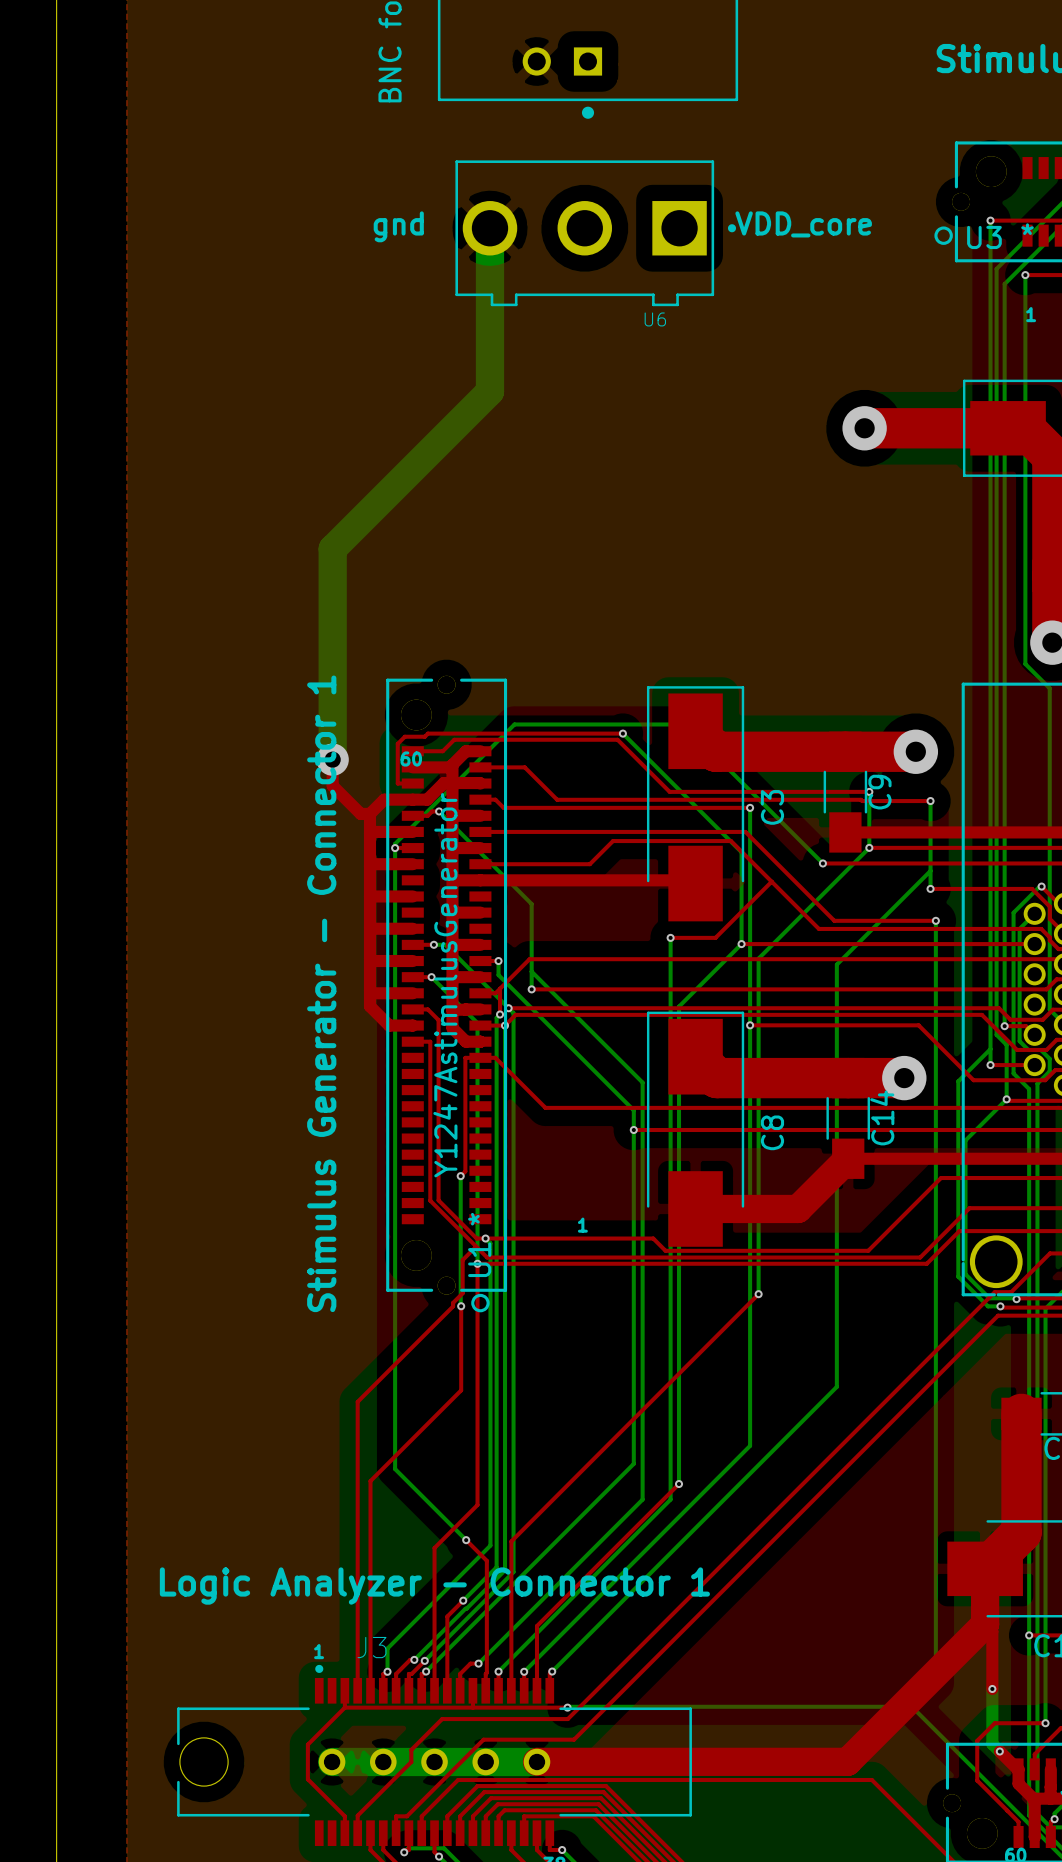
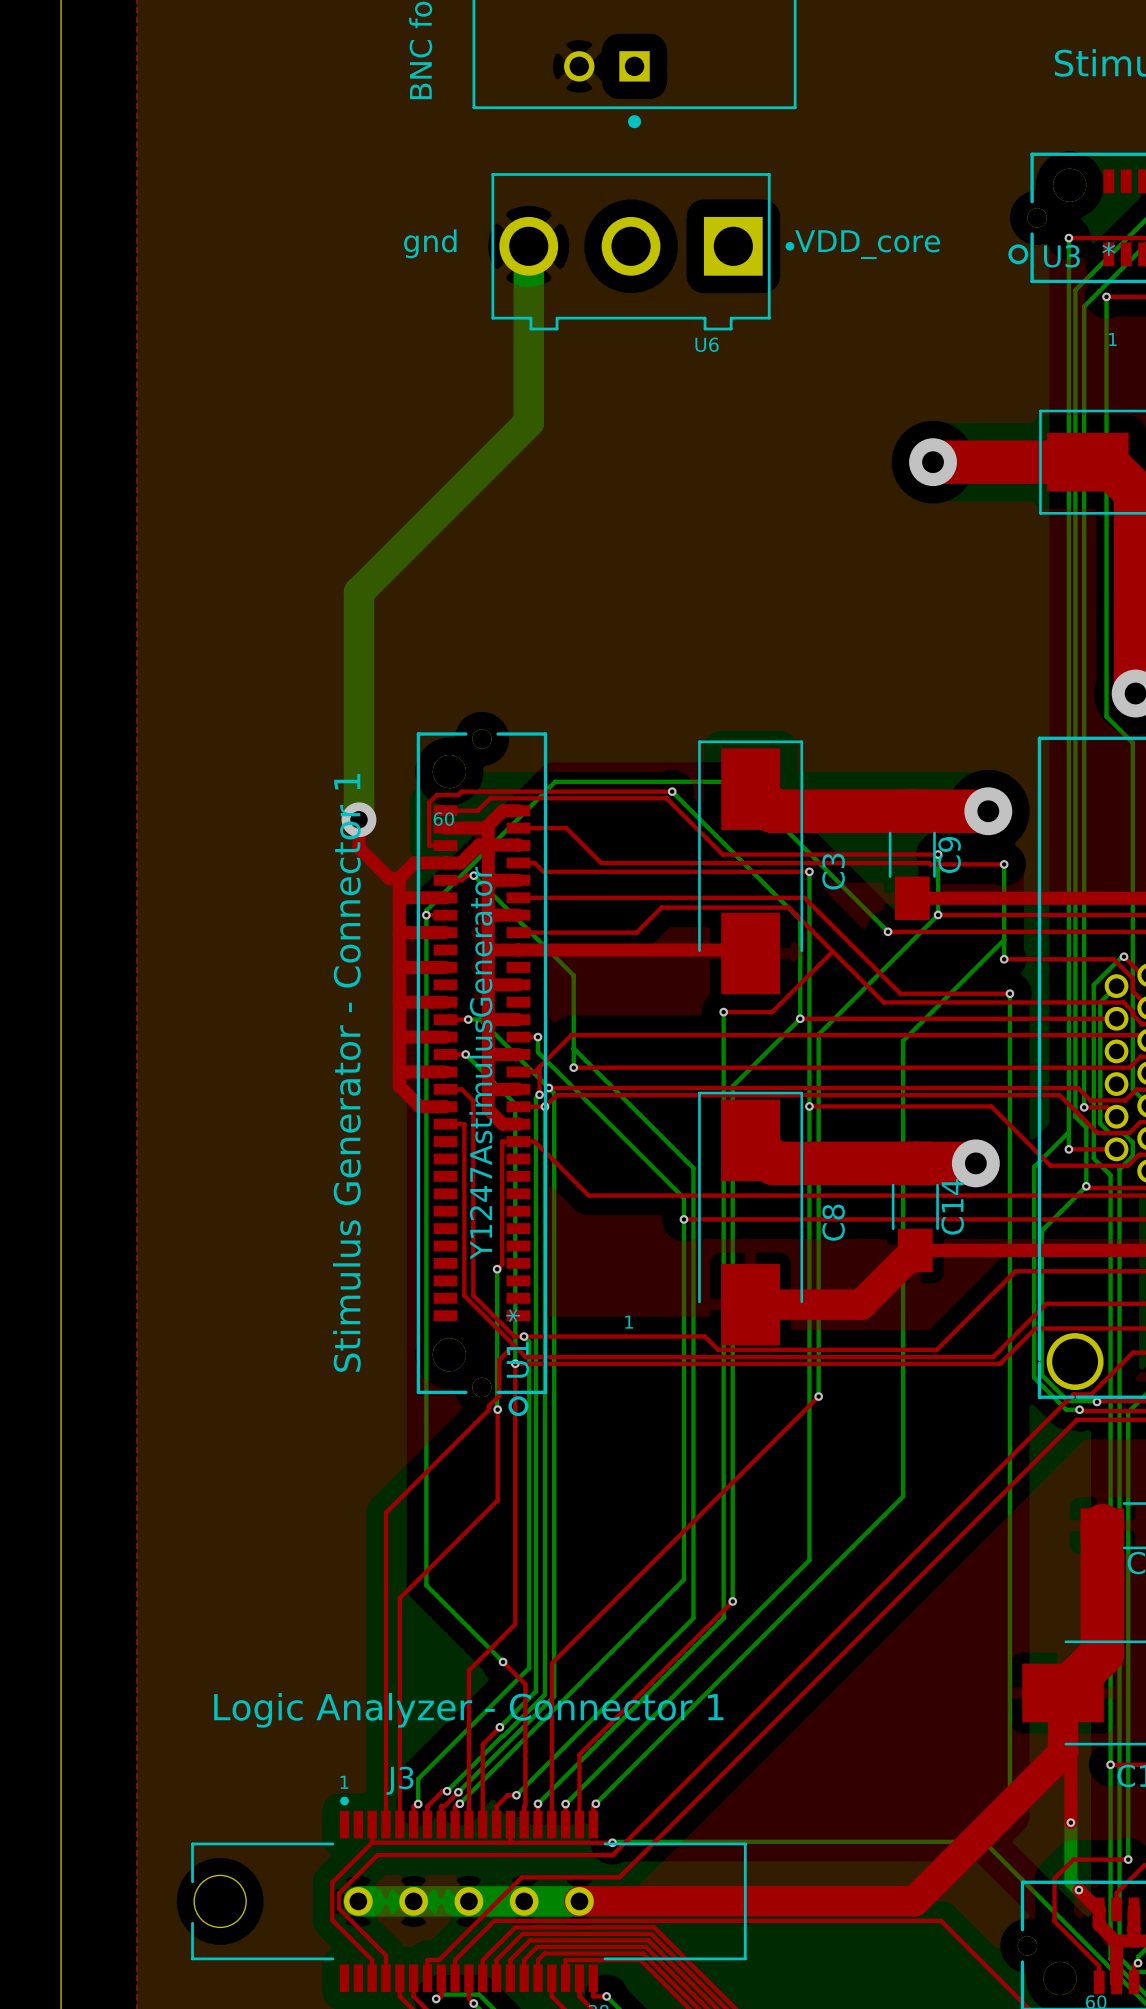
top track: (442, 1719) (411, 1749) (411, 1761) (357, 1815) -> (477, 1855) (377, 1855) (339, 1893) (339, 1908) (385, 1955) (385, 1959)

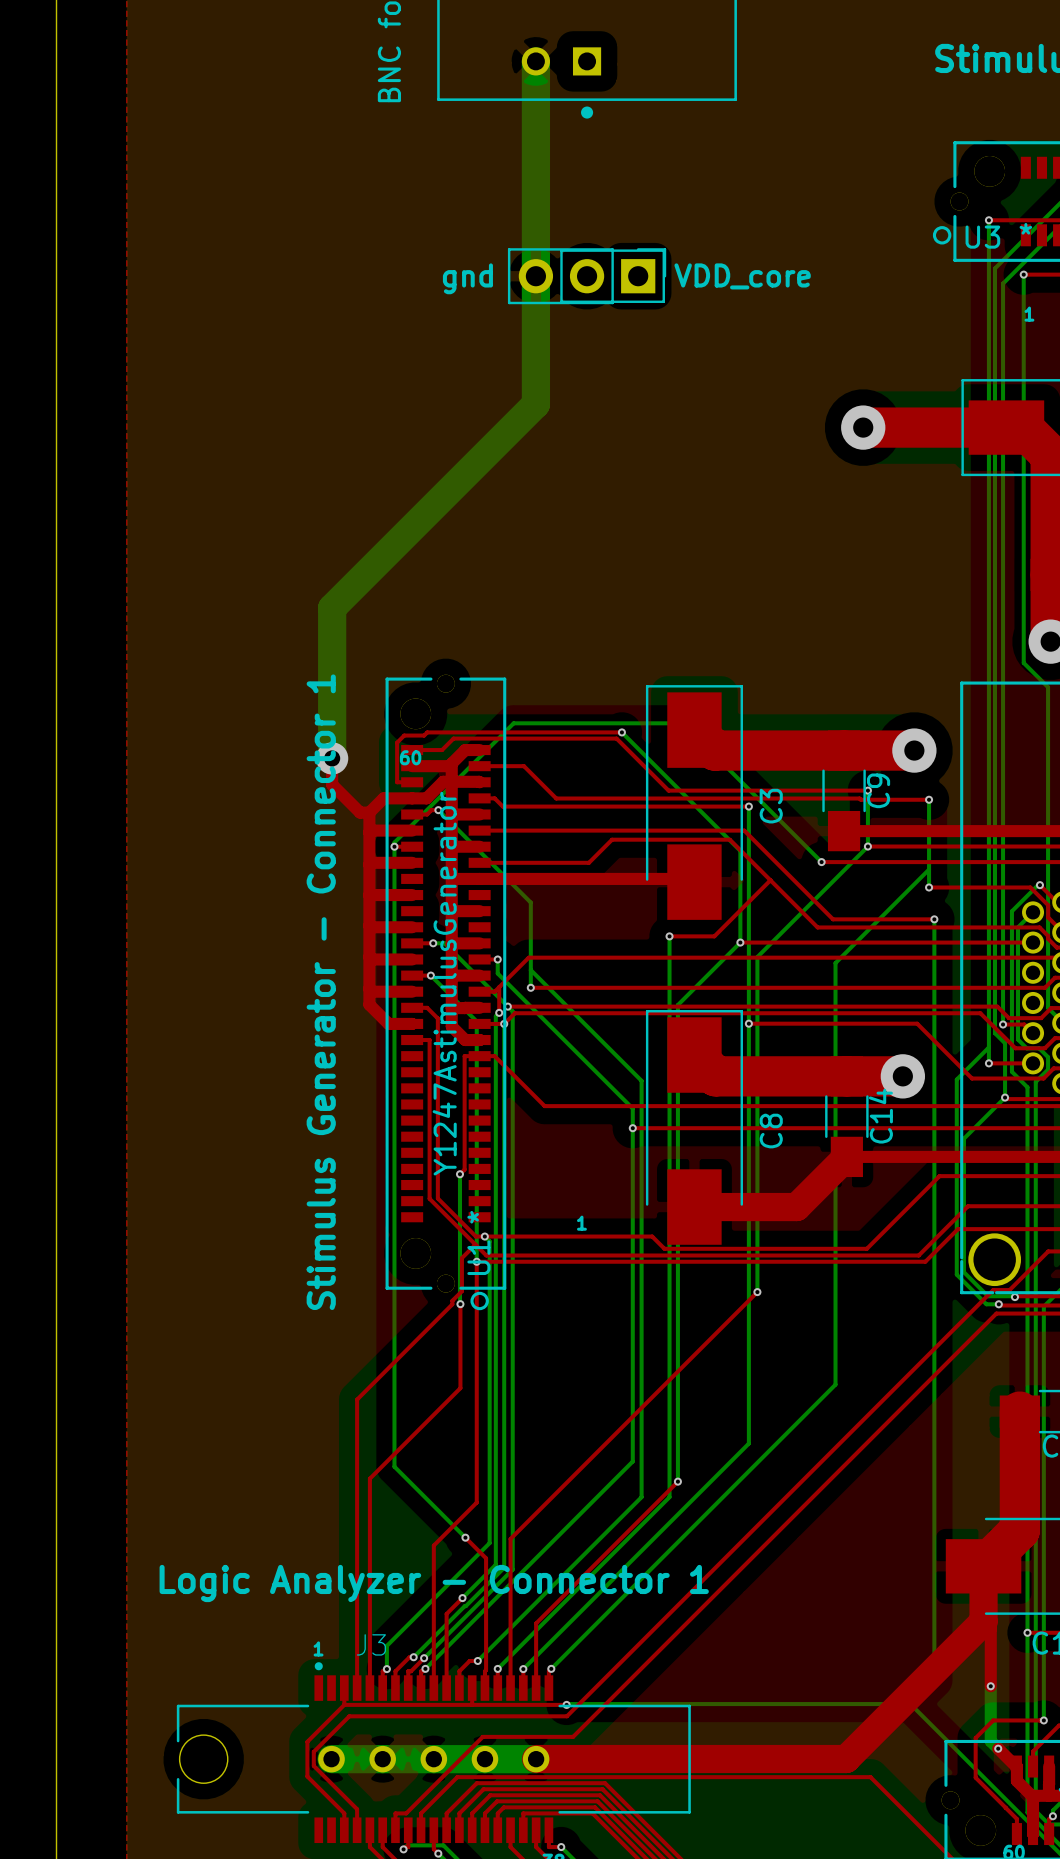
text position: gnd (430, 243) -> gnd (467, 278)
text position: VDD_core (867, 244) -> VDD_core (742, 276)
bottom track: (528, 246) (528, 422) (359, 592) (359, 657) -> (535, 61) (535, 404) (332, 608)
U6: (642, 251) -> none
line: none -> (561, 250) (561, 301) (663, 301) (663, 250) (561, 250)
part: none -> (587, 276)

